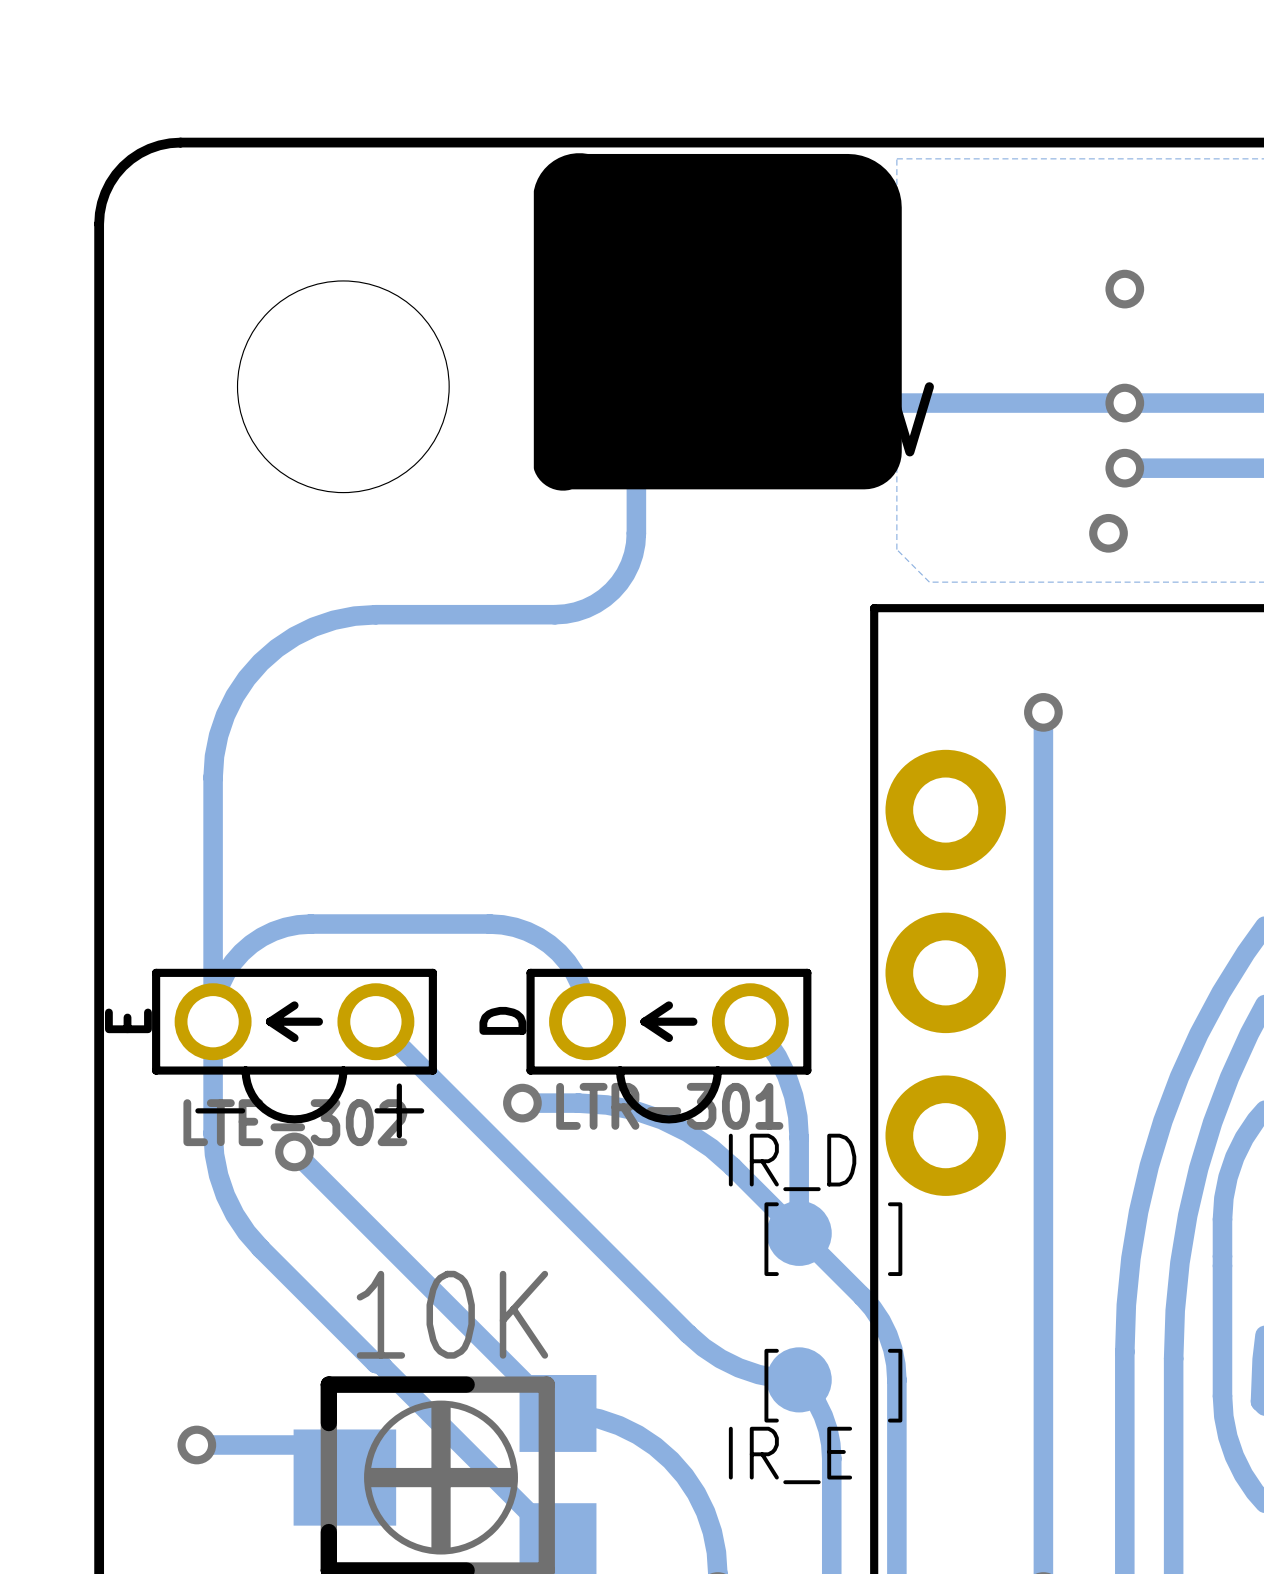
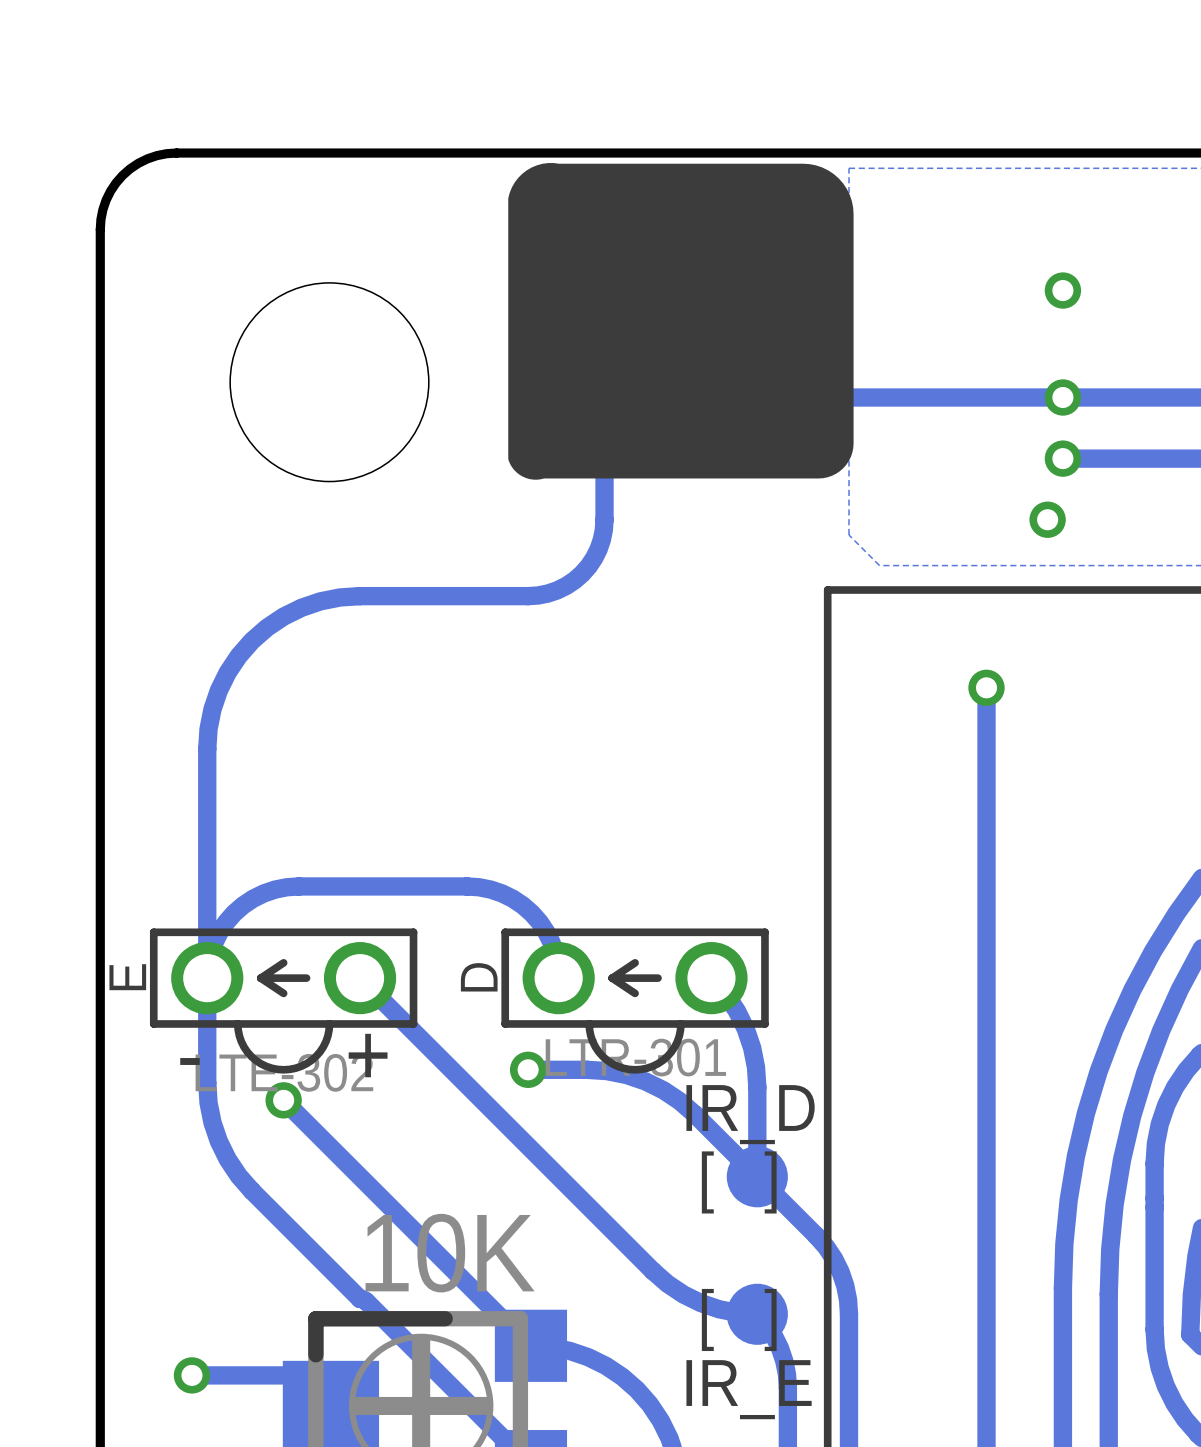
part: (945, 972) -> none
track: (522, 1103) (606, 1104) (635, 1110) (662, 1119) (687, 1132) (711, 1148) (732, 1167) -> (528, 1069) (587, 1069) (626, 1075) (663, 1090) (695, 1114)
via position: (522, 1103) -> (528, 1069)

